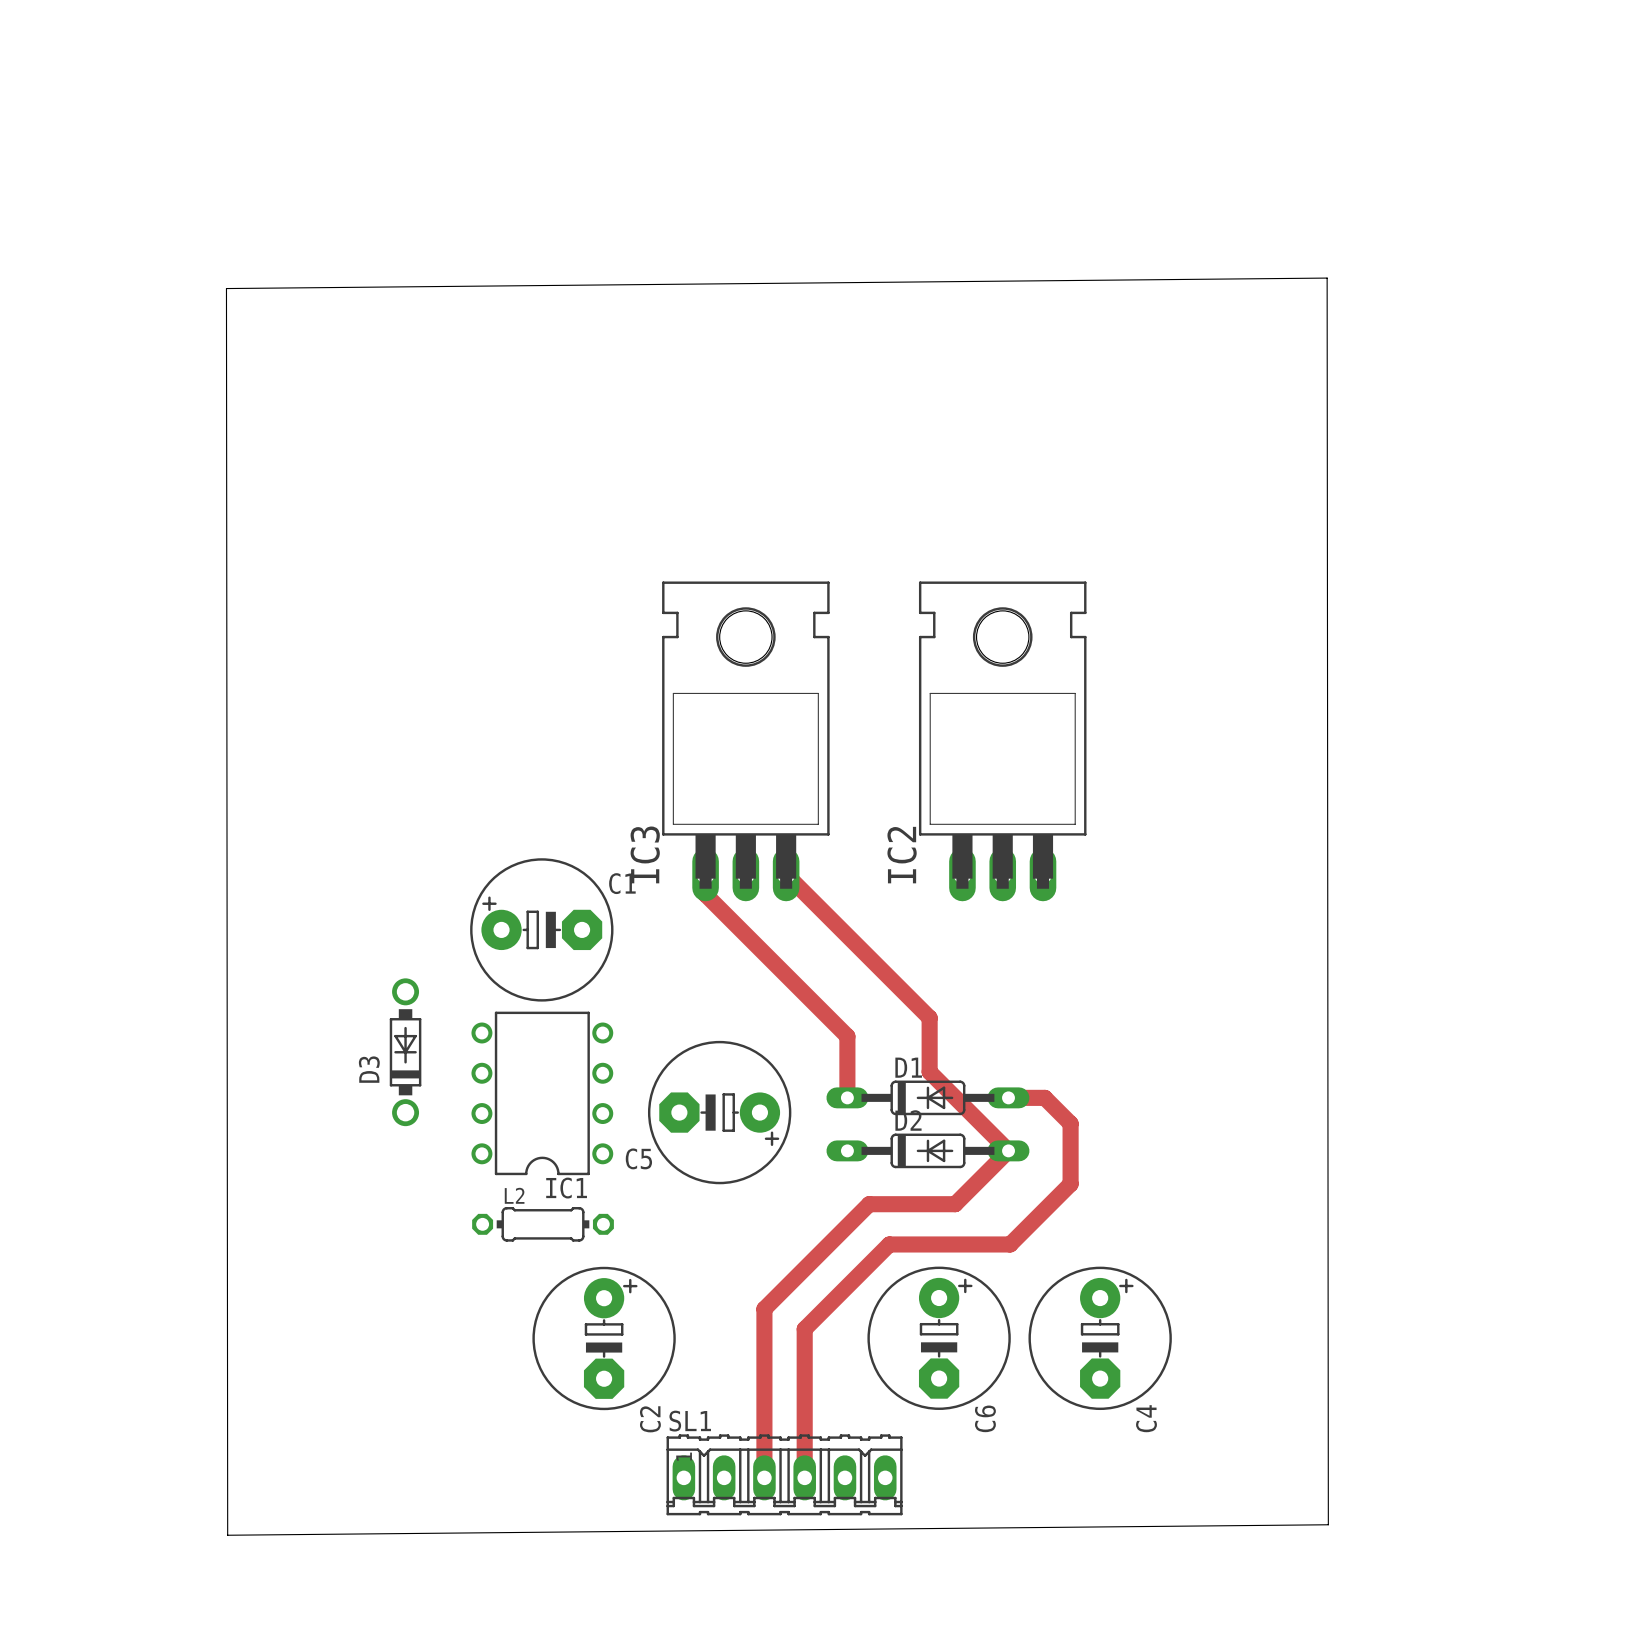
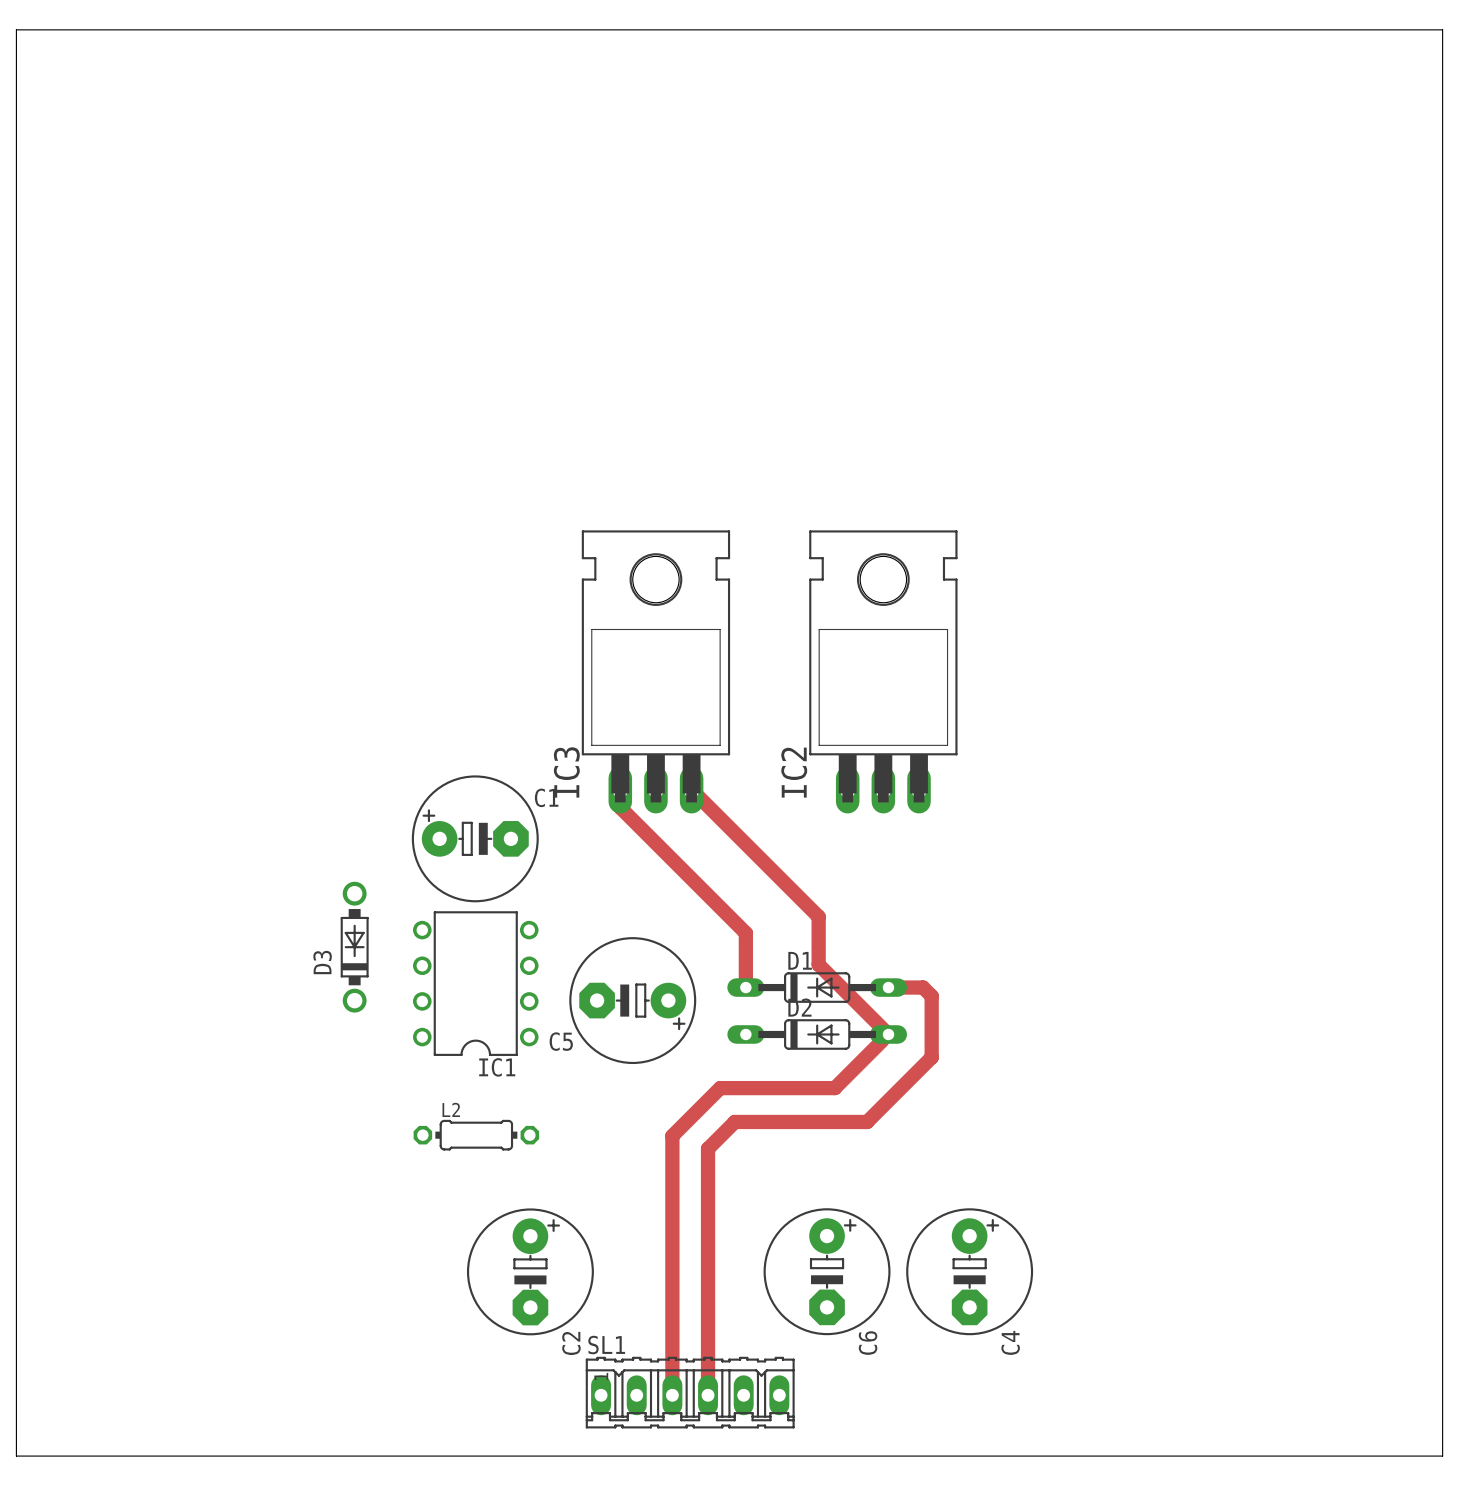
board edge: (1327, 278) (1328, 1524) (227, 1535) (226, 288) (1327, 278) -> (16, 29) (16, 1456) (1442, 1456) (1442, 29) (16, 29)
track: (1044, 1097) (1070, 1123) (1070, 1184) (1010, 1244) (889, 1244) (804, 1329) -> (920, 987) (923, 987) (931, 996) (931, 1057) (867, 1121) (734, 1121) (708, 1148) (708, 1192)
track: (1008, 1150) (955, 1204) (869, 1204) (764, 1309) -> (882, 1040) (834, 1088) (720, 1088) (672, 1135) (672, 1174)
L2 position: (543, 1224) -> (476, 1135)
C2 position: (604, 1338) -> (530, 1271)
C6 position: (939, 1338) -> (827, 1271)
C4 position: (1100, 1338) -> (969, 1271)
SL1 position: (784, 1474) -> (690, 1392)
track: none -> (672, 1323) (672, 1395)
track: none -> (708, 1323) (708, 1395)

